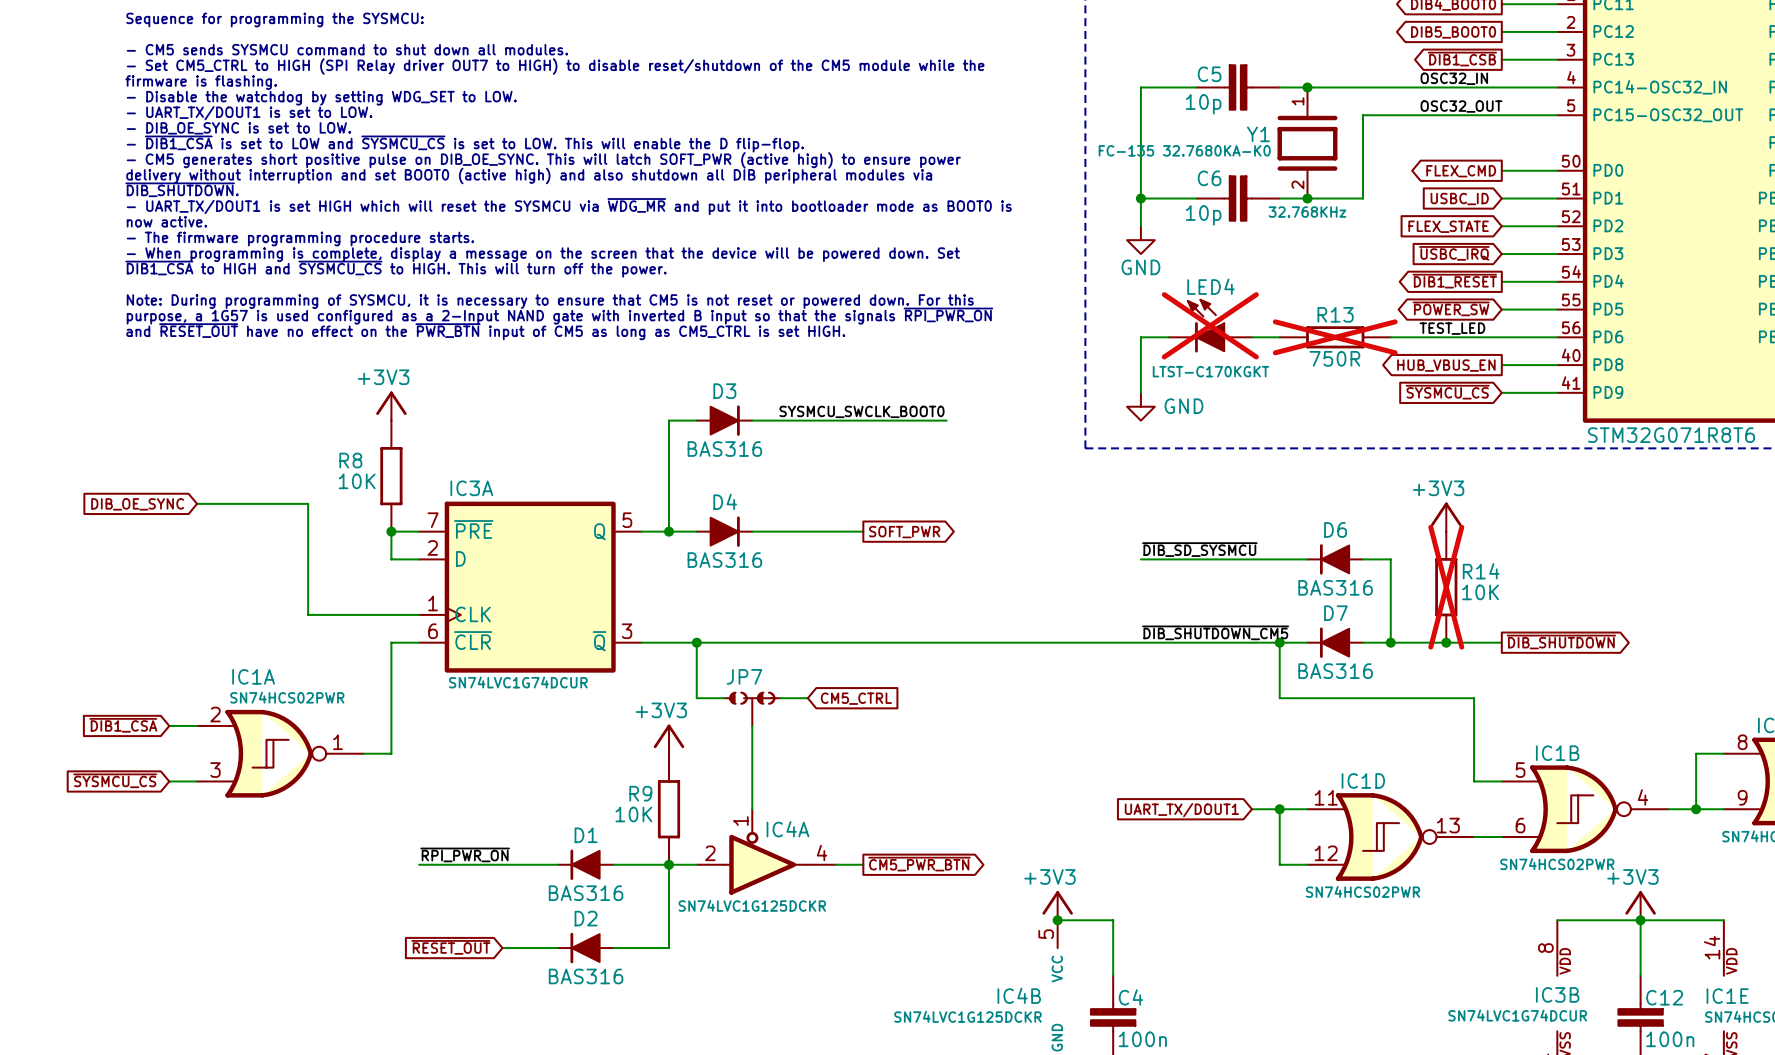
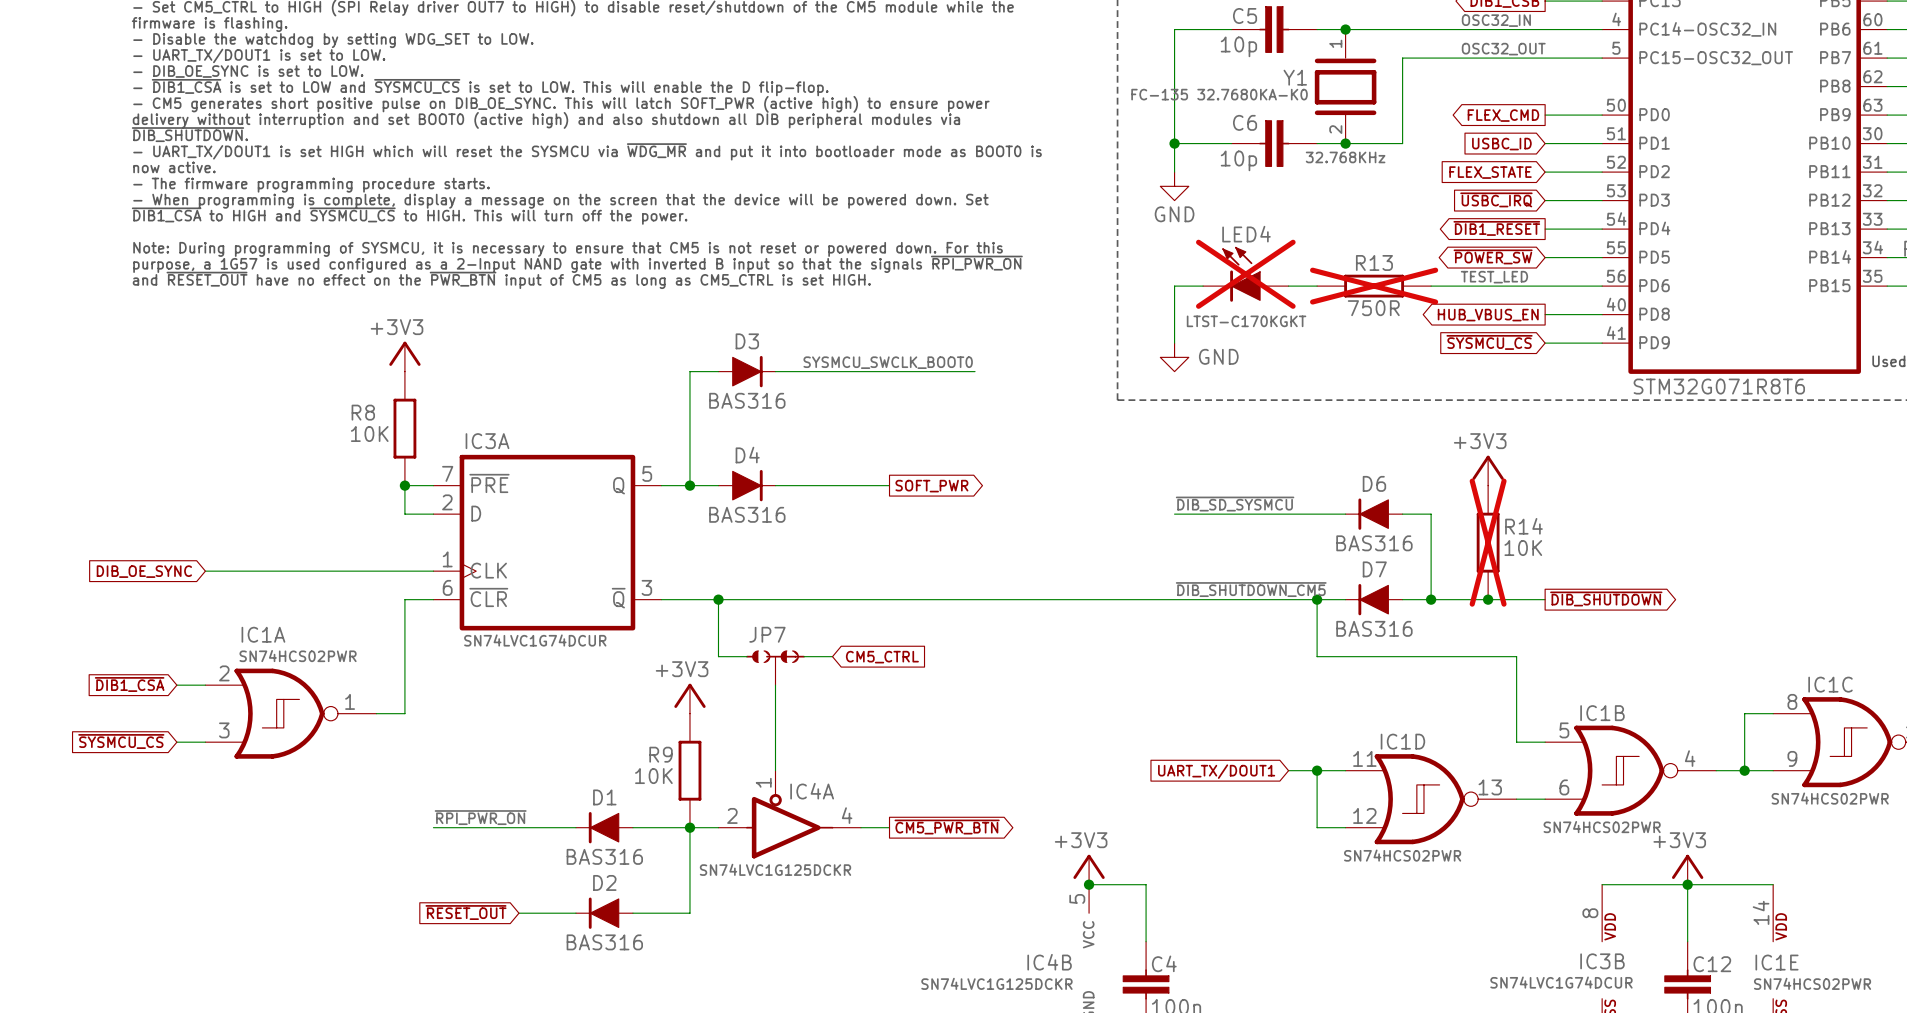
wire: (197, 503) (308, 503) (308, 614) -> (205, 571) (319, 571)
global label position: DIB_OE_SYNC (137, 504) -> DIB_OE_SYNC (144, 571)

